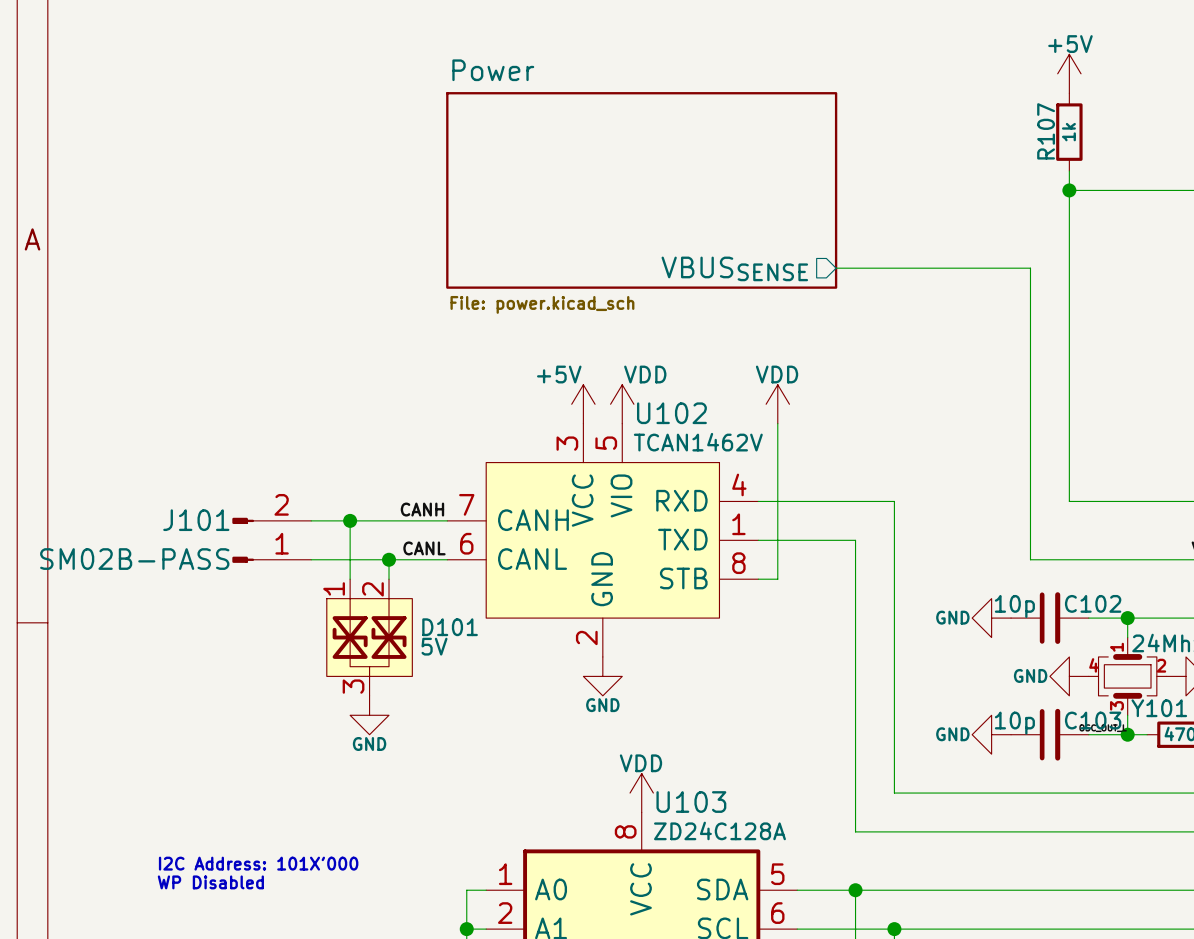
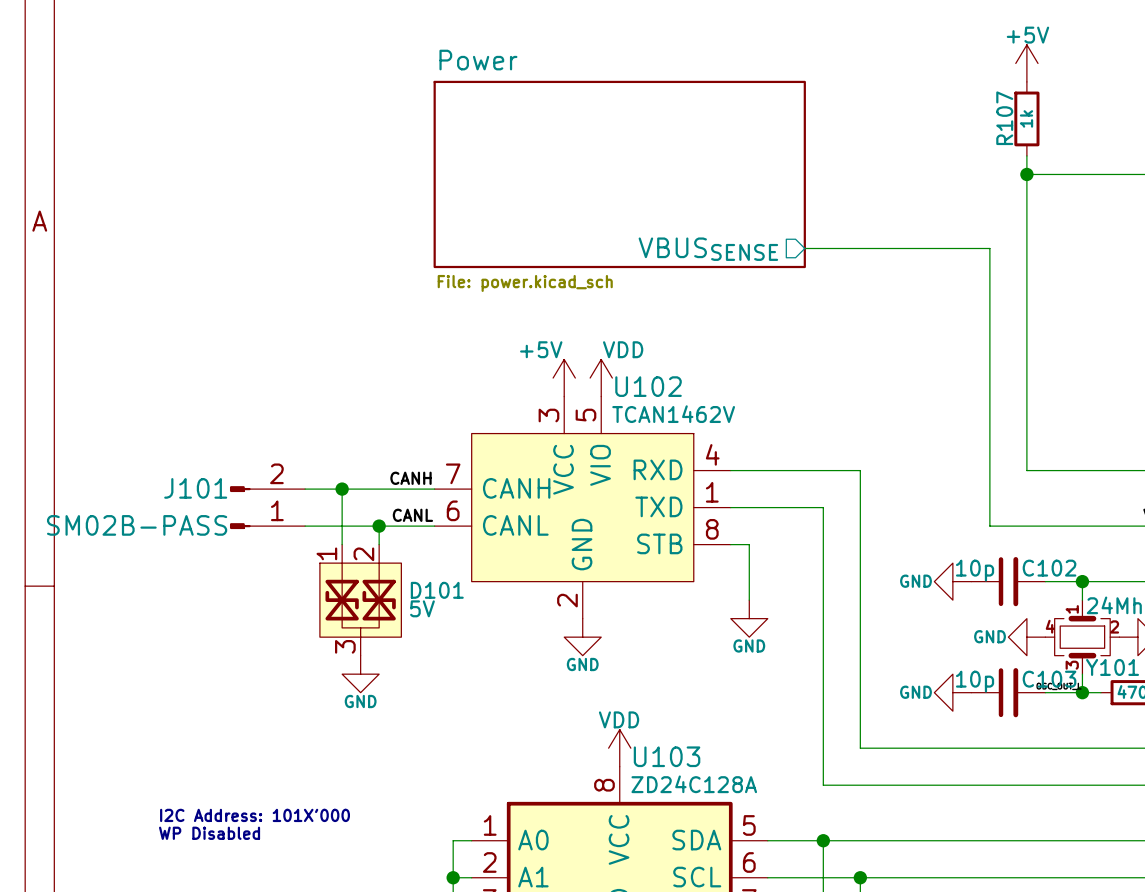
power symbol: VDD (777, 404) -> none
wire: (777, 423) (777, 579) -> (749, 600) (749, 544)
power symbol: none -> GND (749, 618)

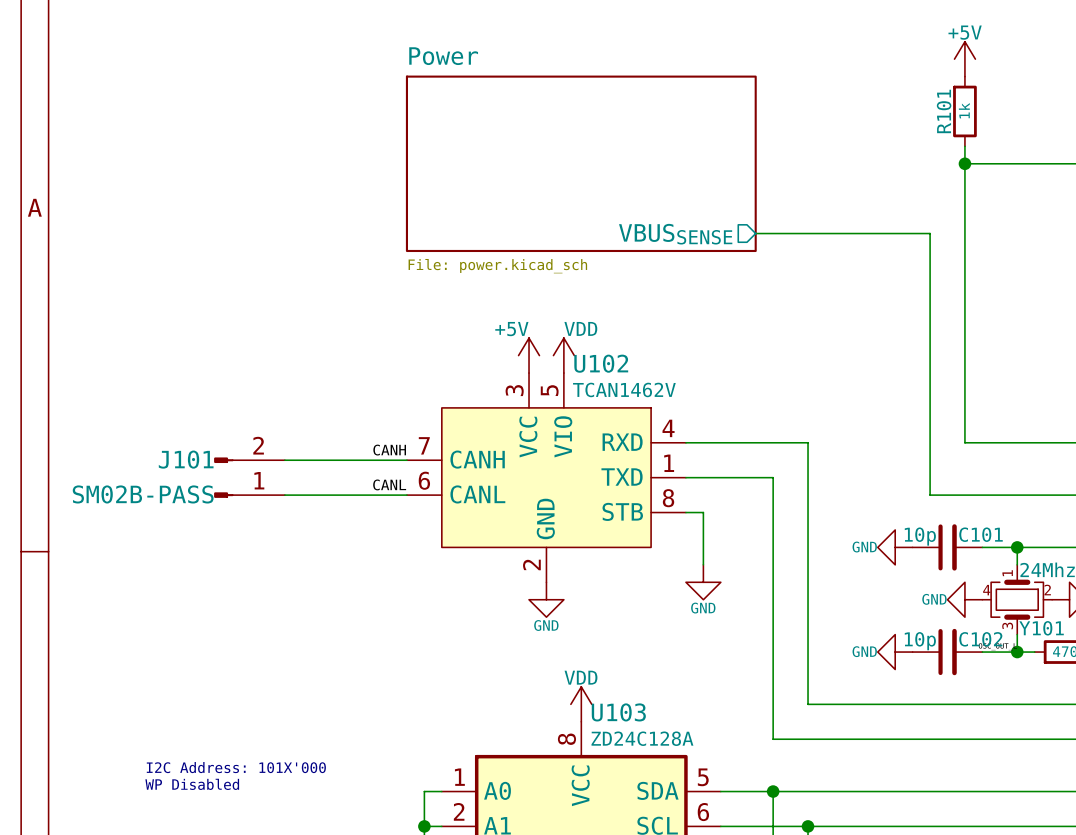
R107 name: R107 (1004, 118) -> R101 (944, 111)
wire: (342, 489) (342, 544) -> none
junction: (342, 489) -> none
wire: (379, 526) (379, 544) -> none
junction: (379, 526) -> none
C102 name: C102 (1049, 568) -> C101 (981, 534)
D101: 5V (360, 600) -> none
power symbol: GND (360, 674) -> none
C103 name: C103 (1049, 679) -> C102 (980, 639)

